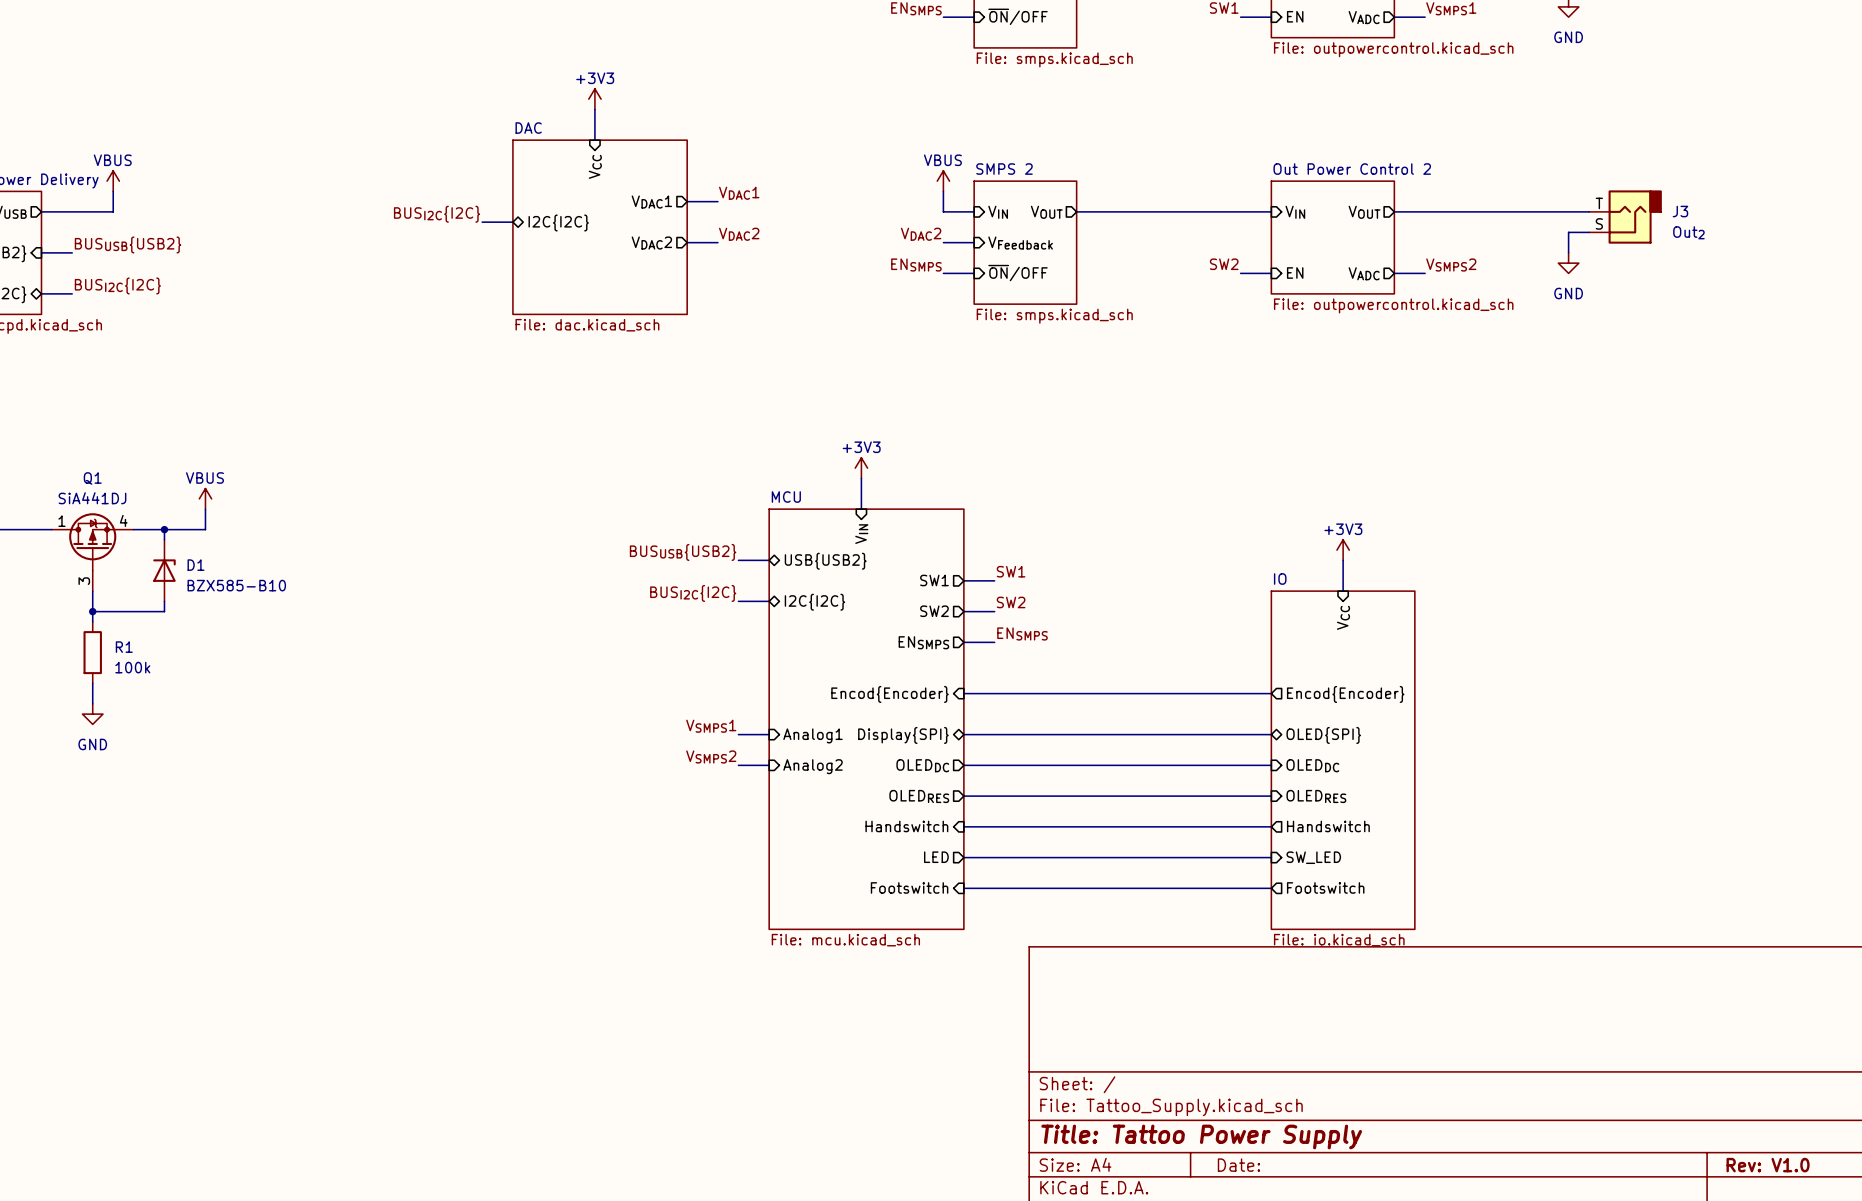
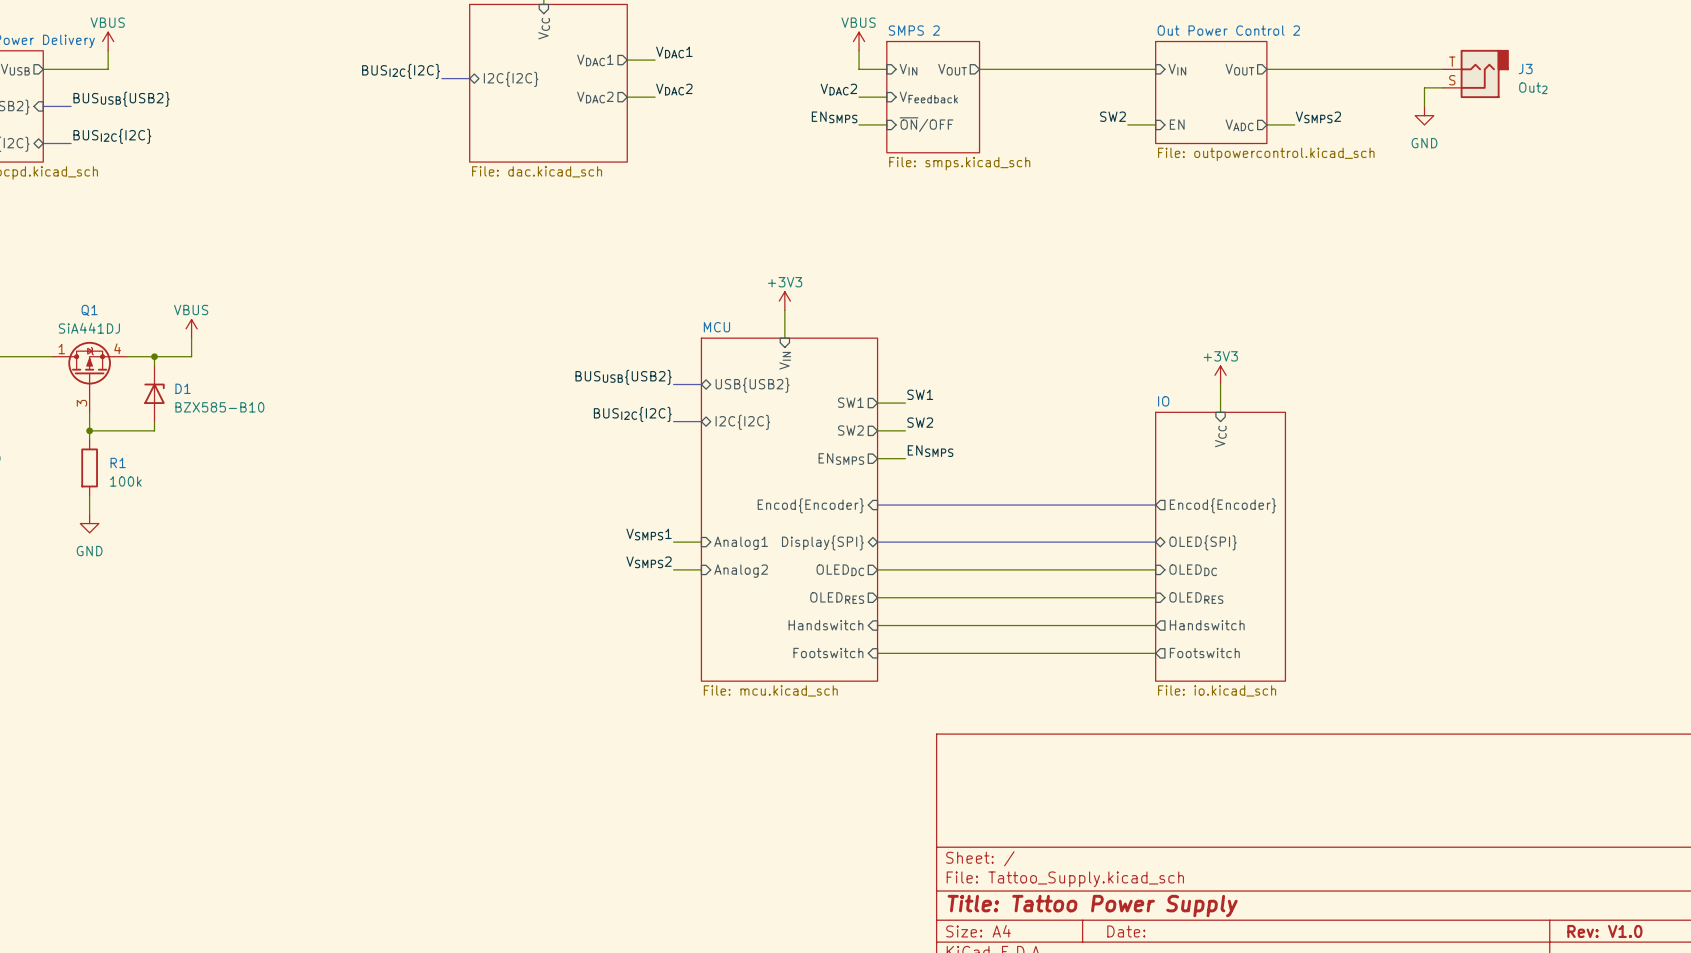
sheet MCU: none -> File: mcu.kicad_sch (789, 509)
sheet MCU: File: mcu.kicad_sch (866, 719) -> none
sheet IO: none -> File: io.kicad_sch (1220, 546)
sheet IO: File: io.kicad_sch (1343, 760) -> none
sheet pin shape: output (936, 857) -> input (828, 653)
sheet pin: LED (936, 857) -> Footswitch (828, 653)
sheet pin shape: input (1313, 857) -> output (1204, 653)
sheet pin: SW_LED (1313, 857) -> Footswitch (1204, 653)
sheet pin: Footswitch (909, 887) -> none
sheet pin: Footswitch (1325, 887) -> none
wire: (963, 888) (1271, 888) -> none

